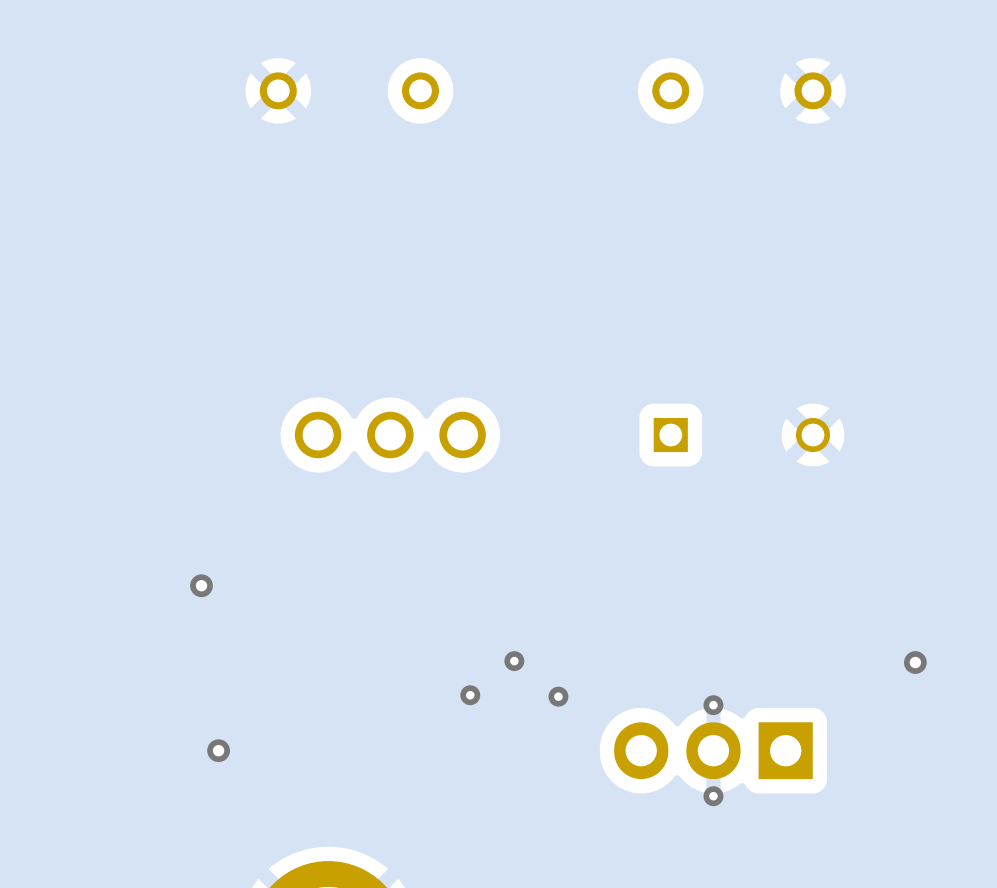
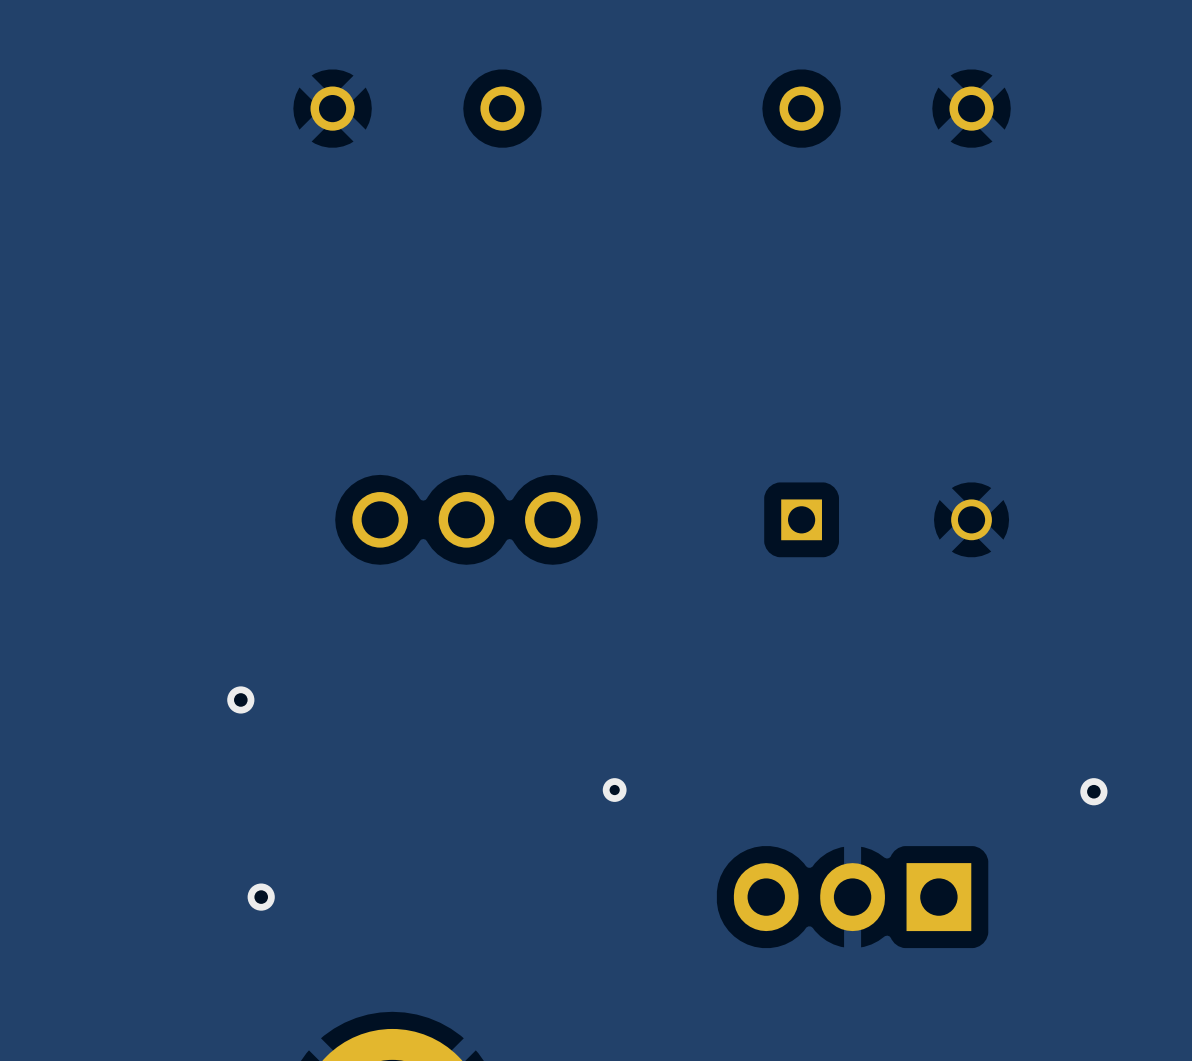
via: (470, 695) -> none
via: (558, 696) -> none
via: (713, 705) -> none
via: (713, 796) -> none

